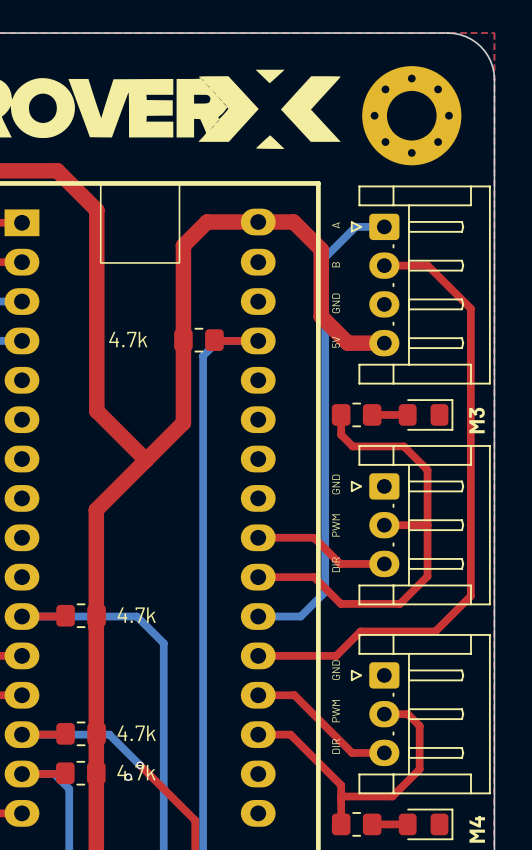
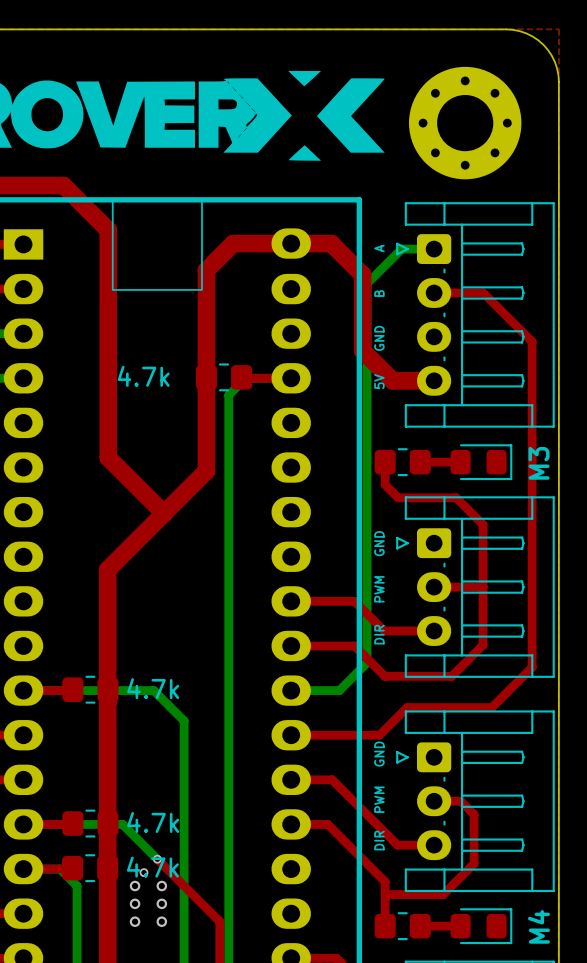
via: none -> (135, 886)
via: none -> (161, 886)
via: none -> (135, 903)
via: none -> (161, 903)
via: none -> (135, 921)
via: none -> (161, 921)

